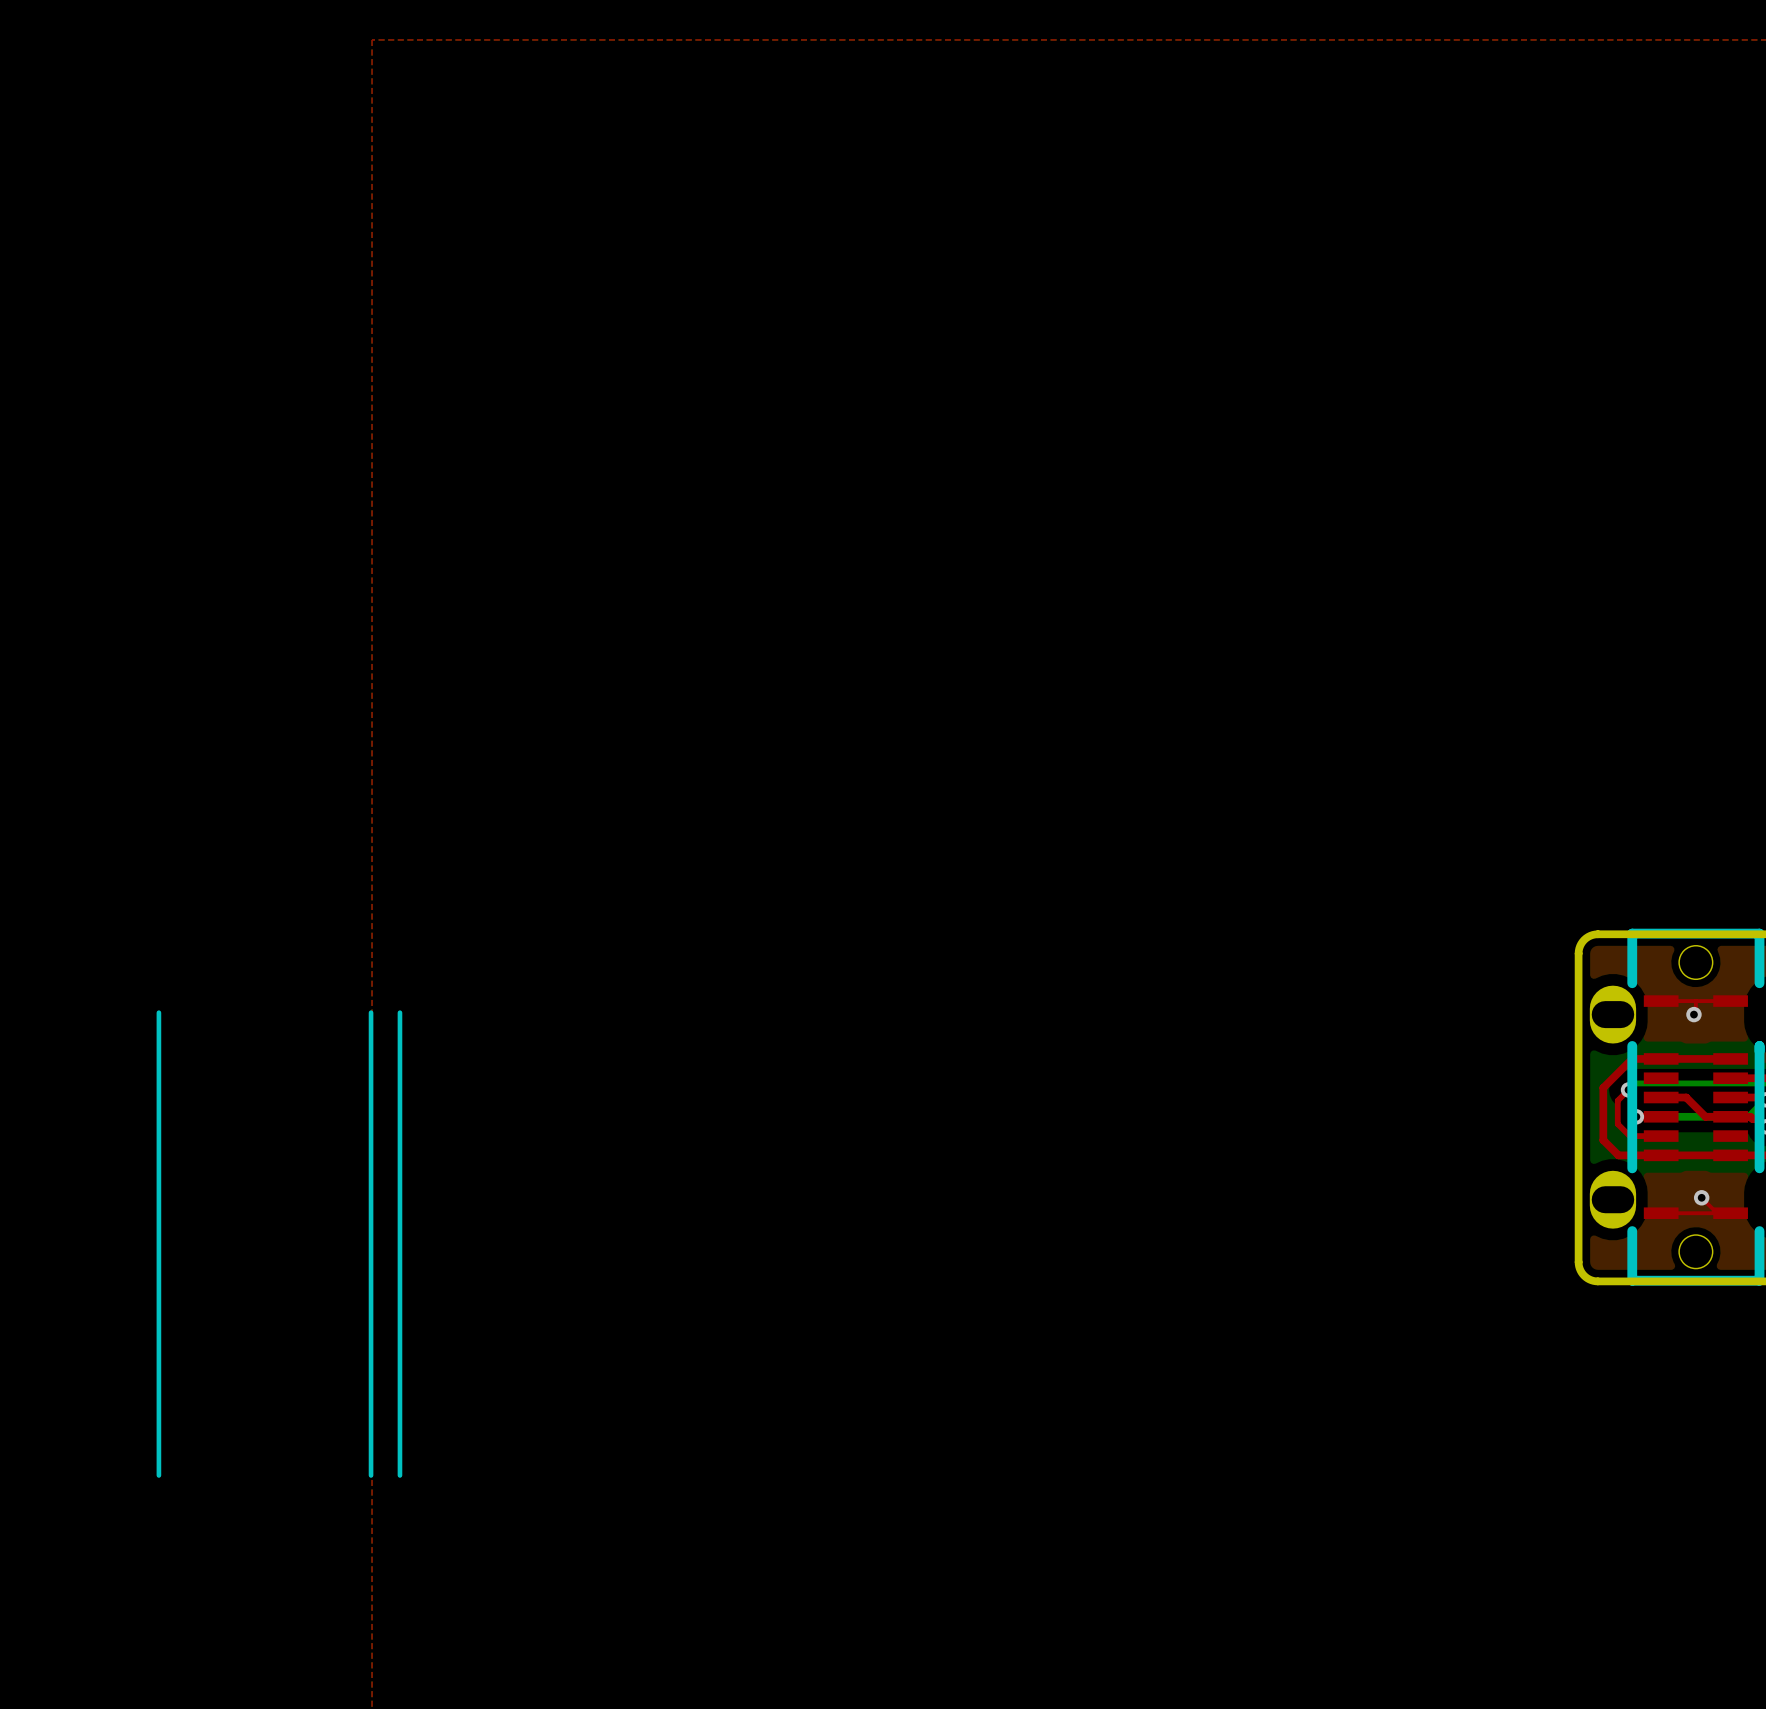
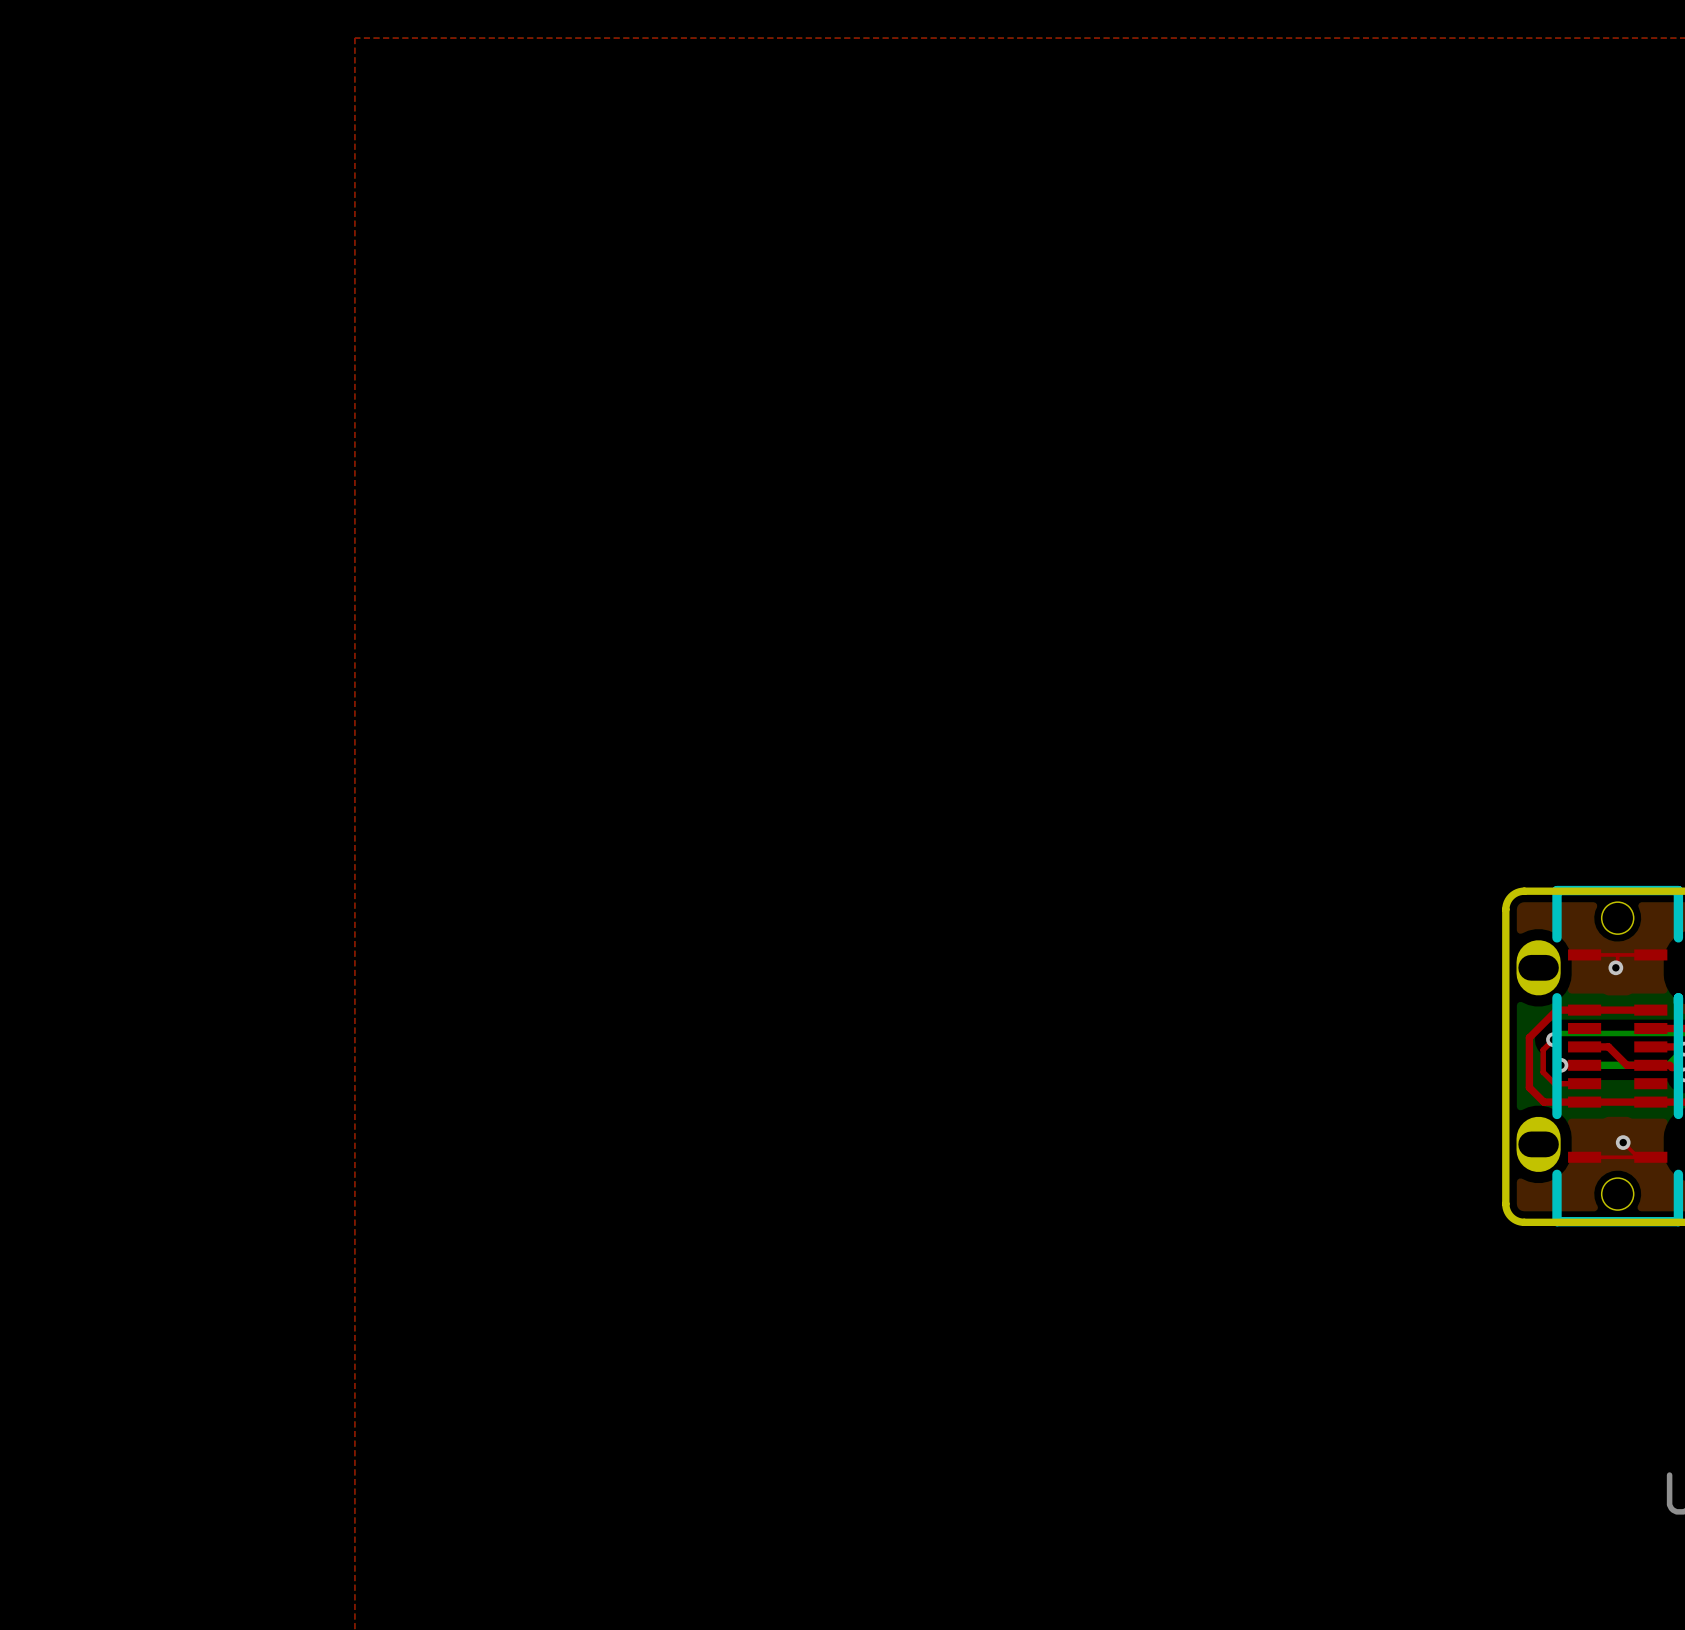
line: (158, 1012) (158, 1475) -> none
line: (371, 1012) (371, 1475) -> none
line: (399, 1012) (399, 1475) -> none

